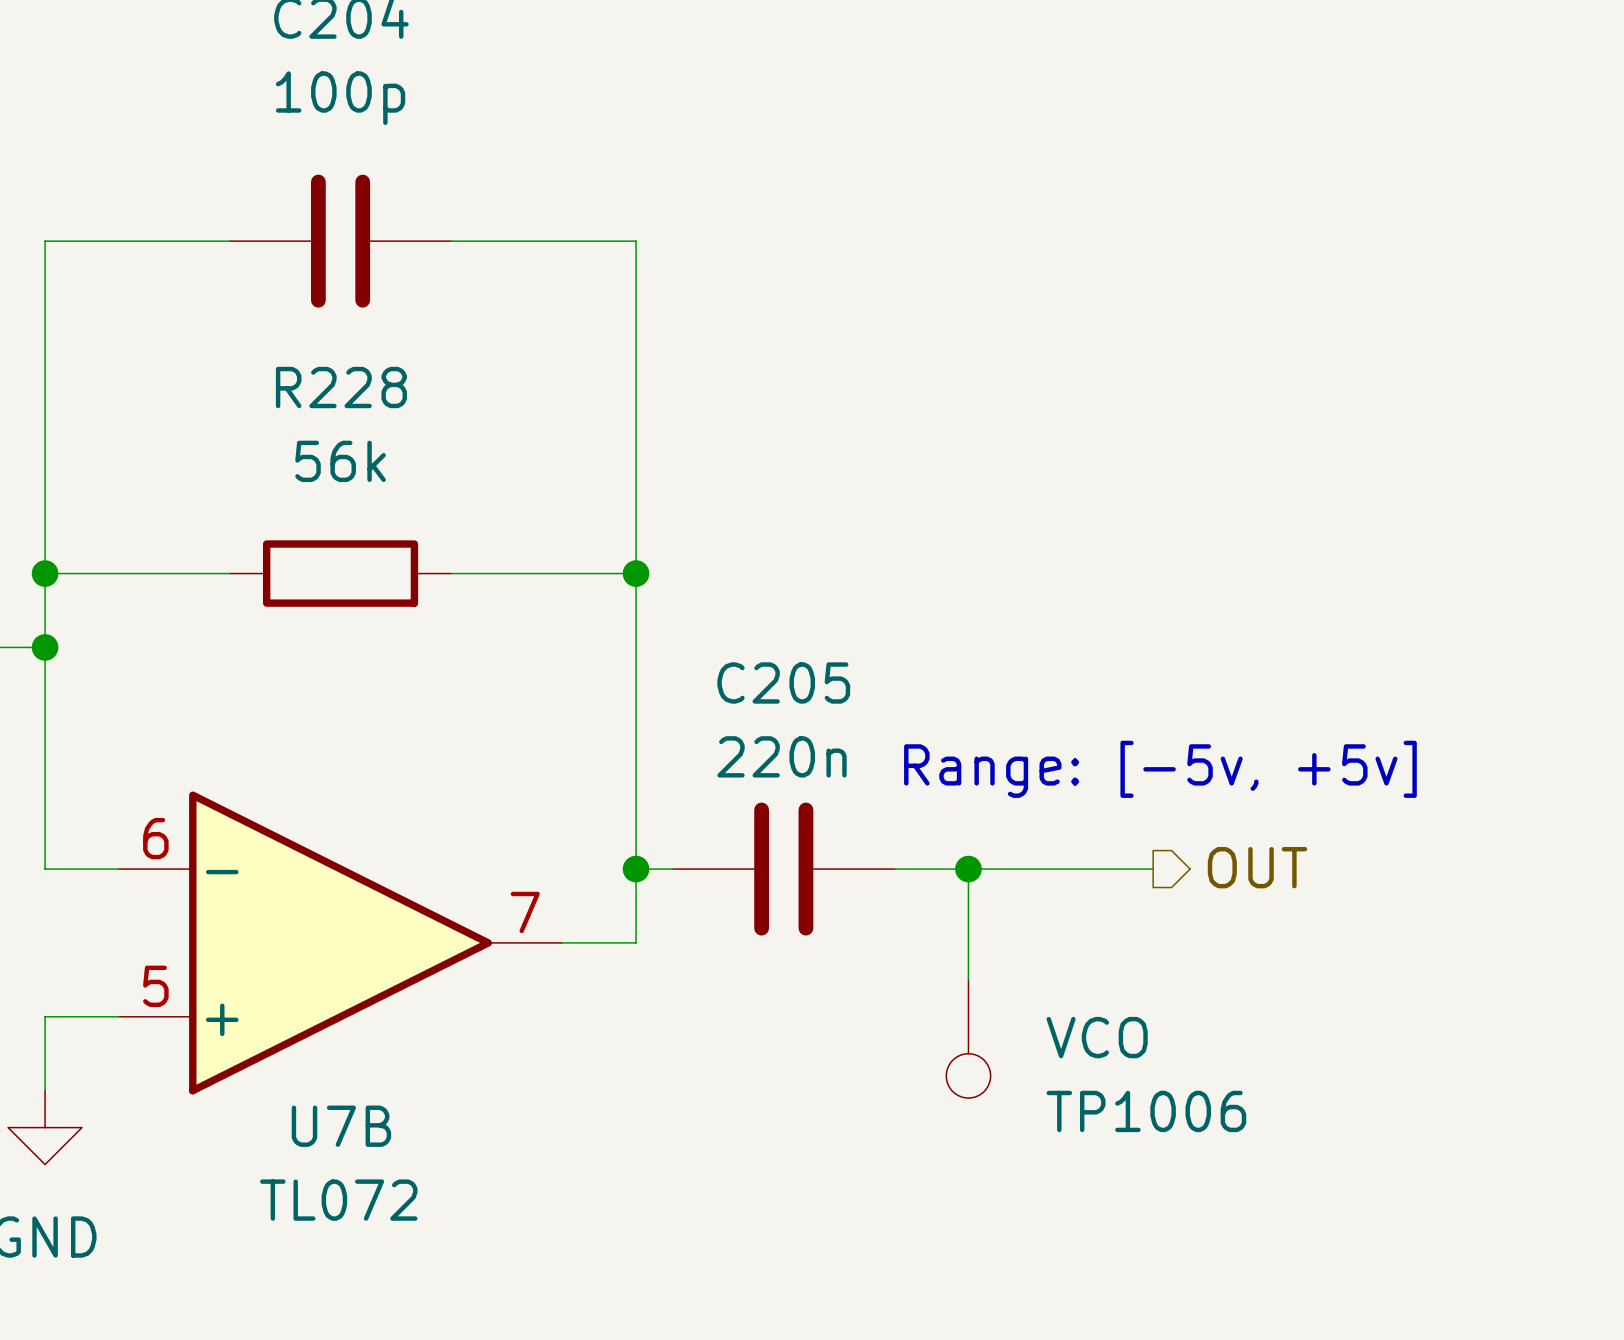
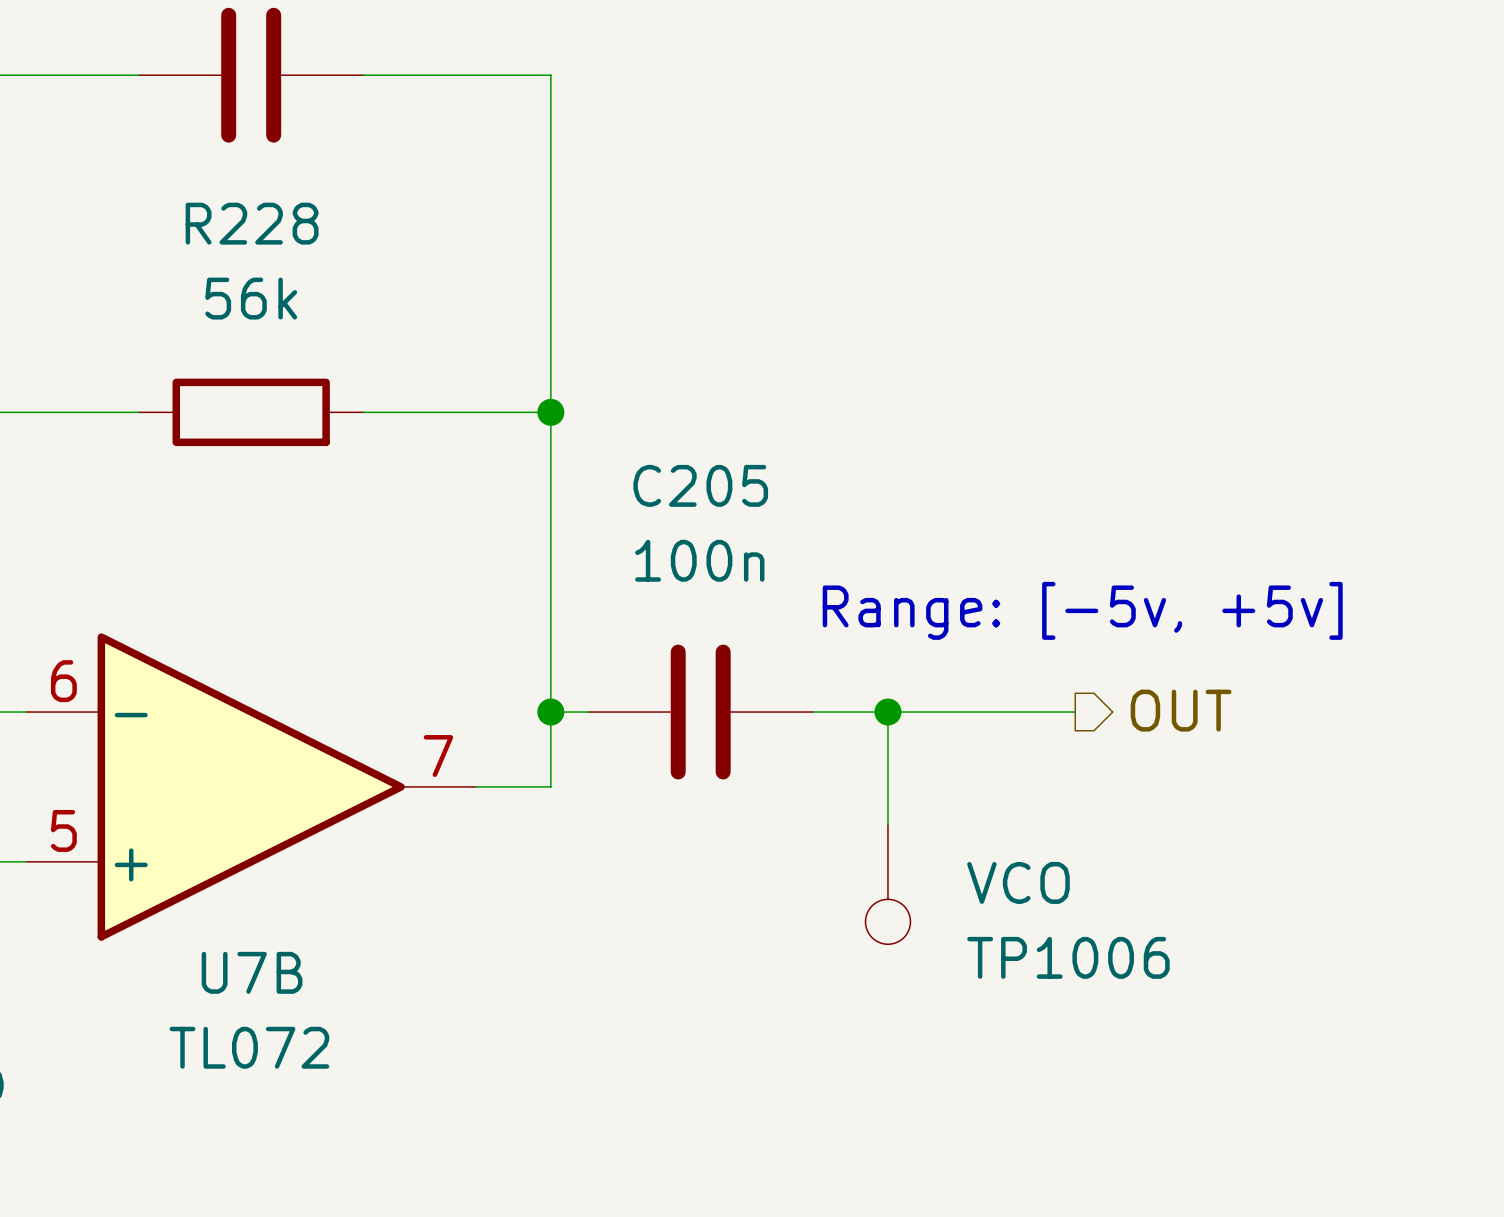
C205 name position: C205 (783, 682) -> C205 (700, 485)
C205 value: 220n (782, 756) -> 100n (699, 560)

